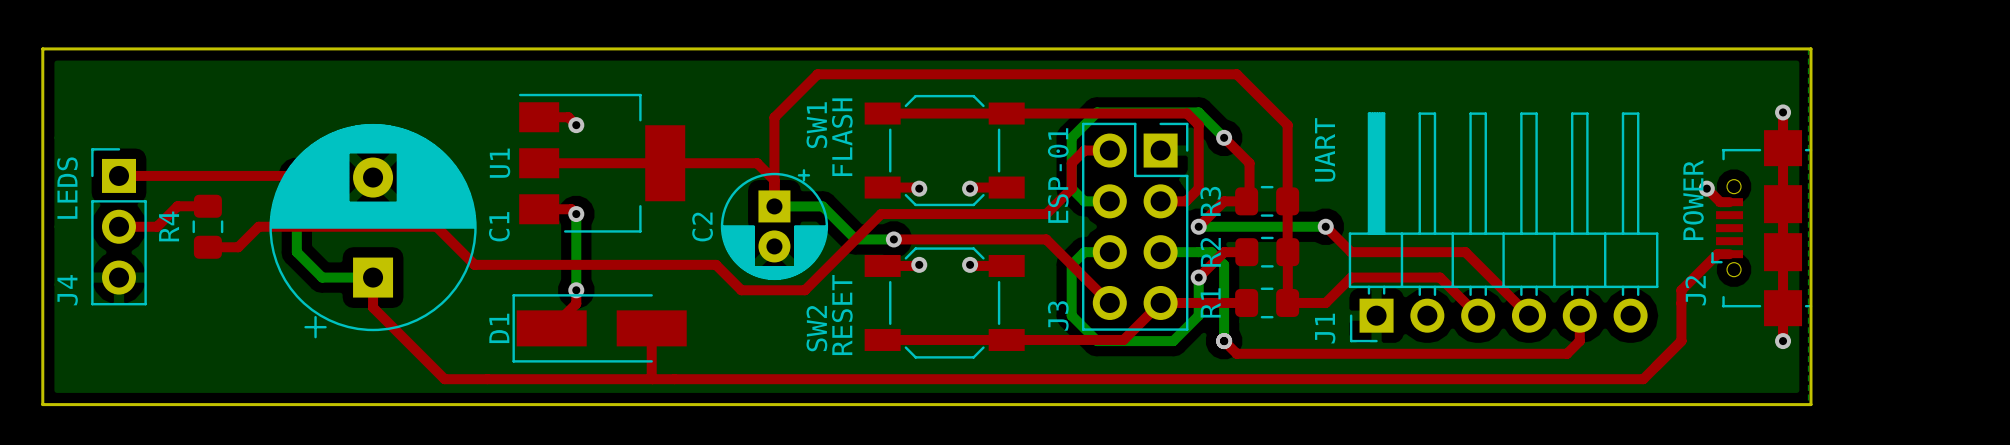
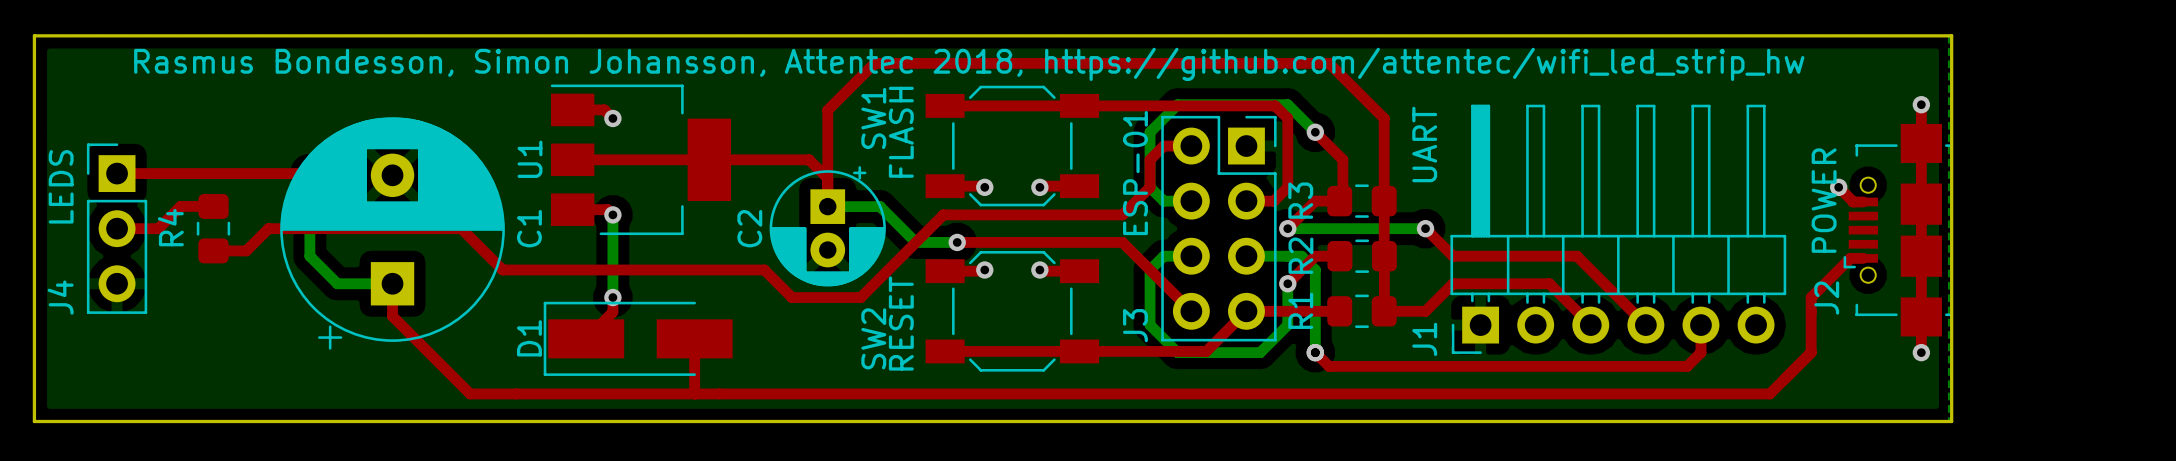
text: none -> Rasmus Bondesson, Simon Johansson, Attentec 2018, https://github.com/attentec/wifi_led_strip_hw (969, 64)

